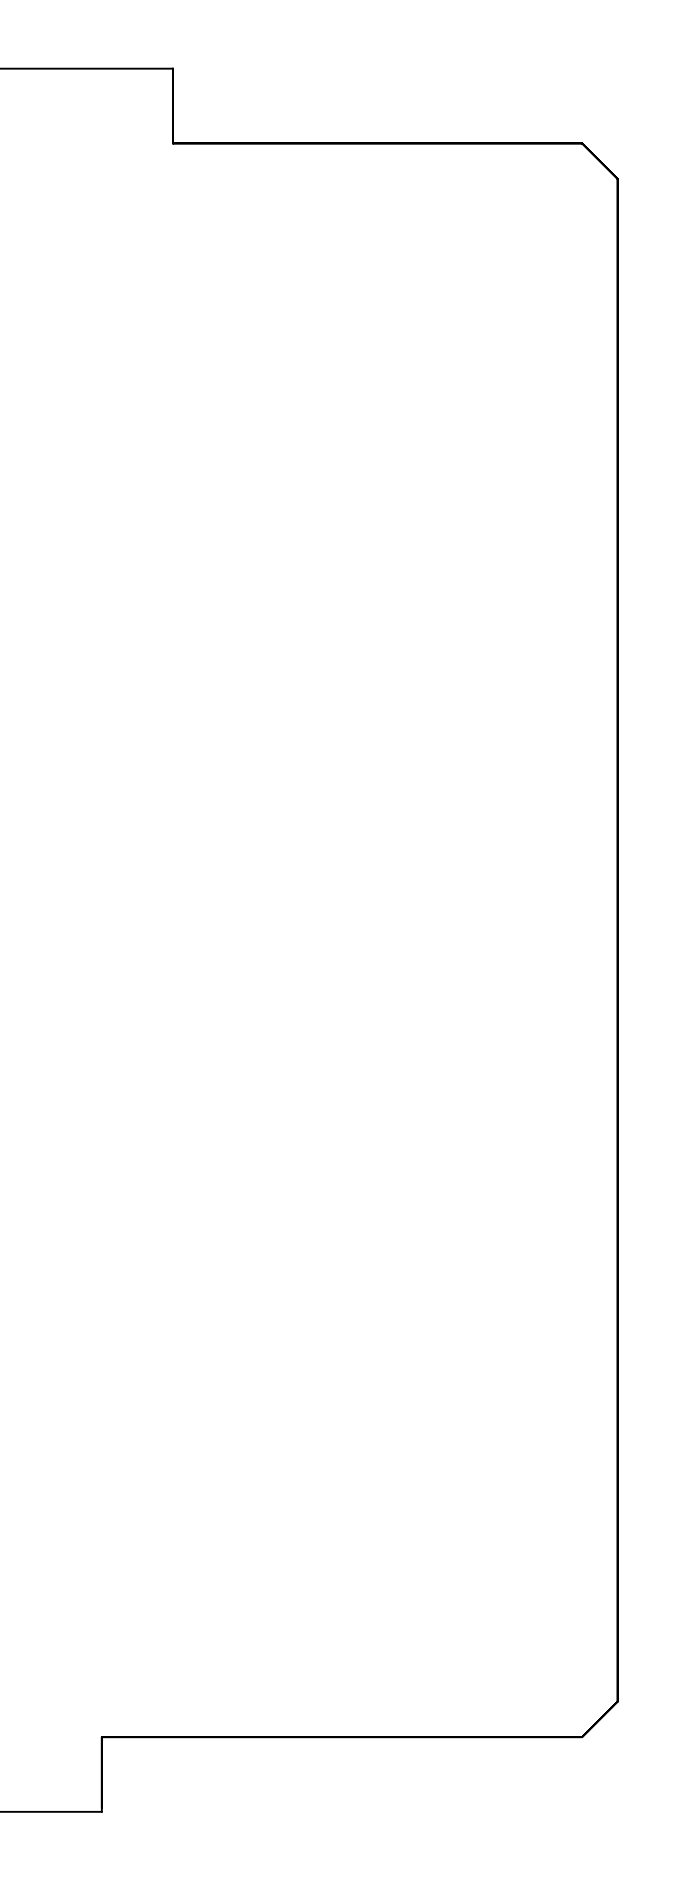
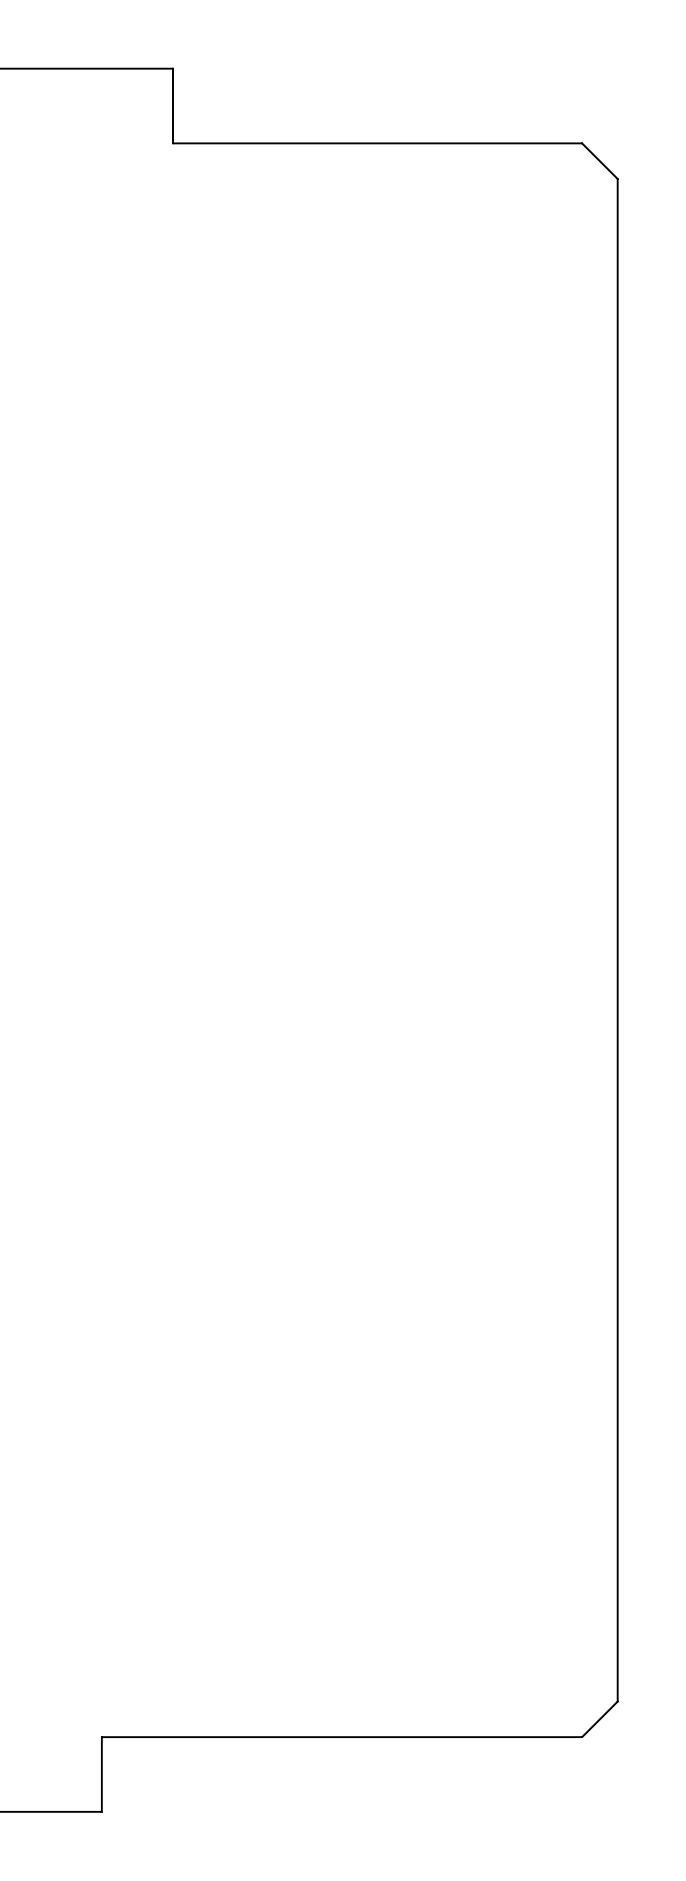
part: (359, 938) -> none

